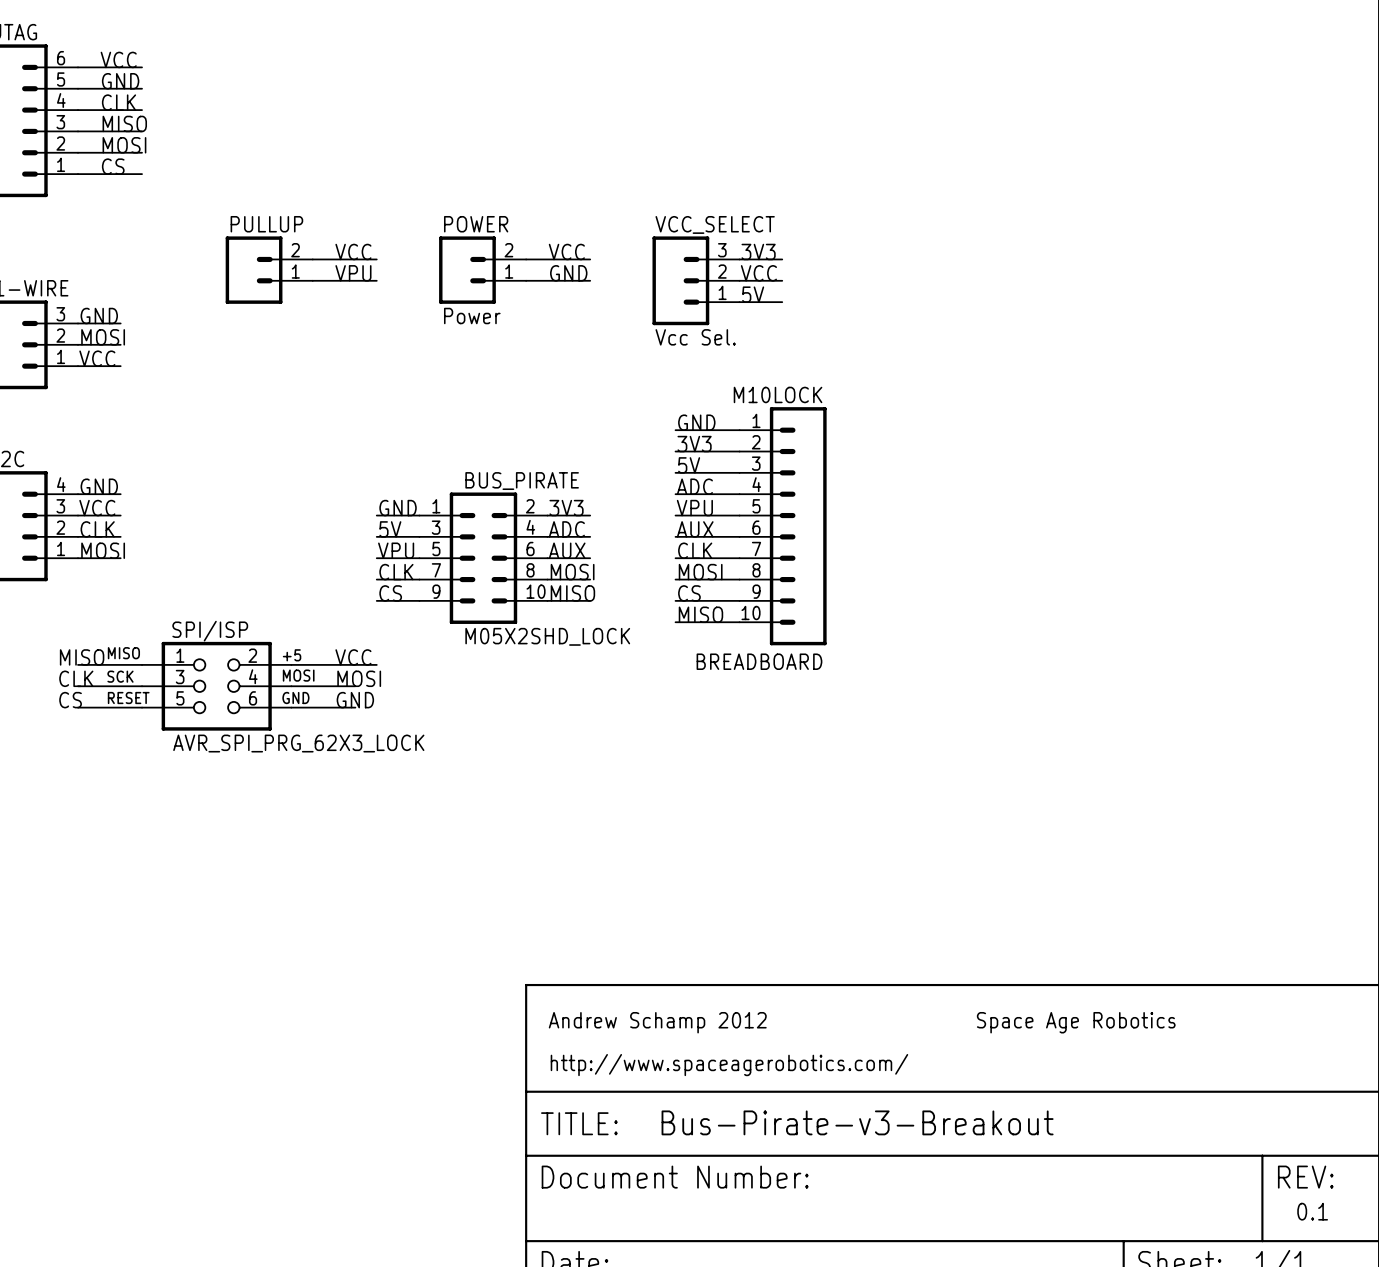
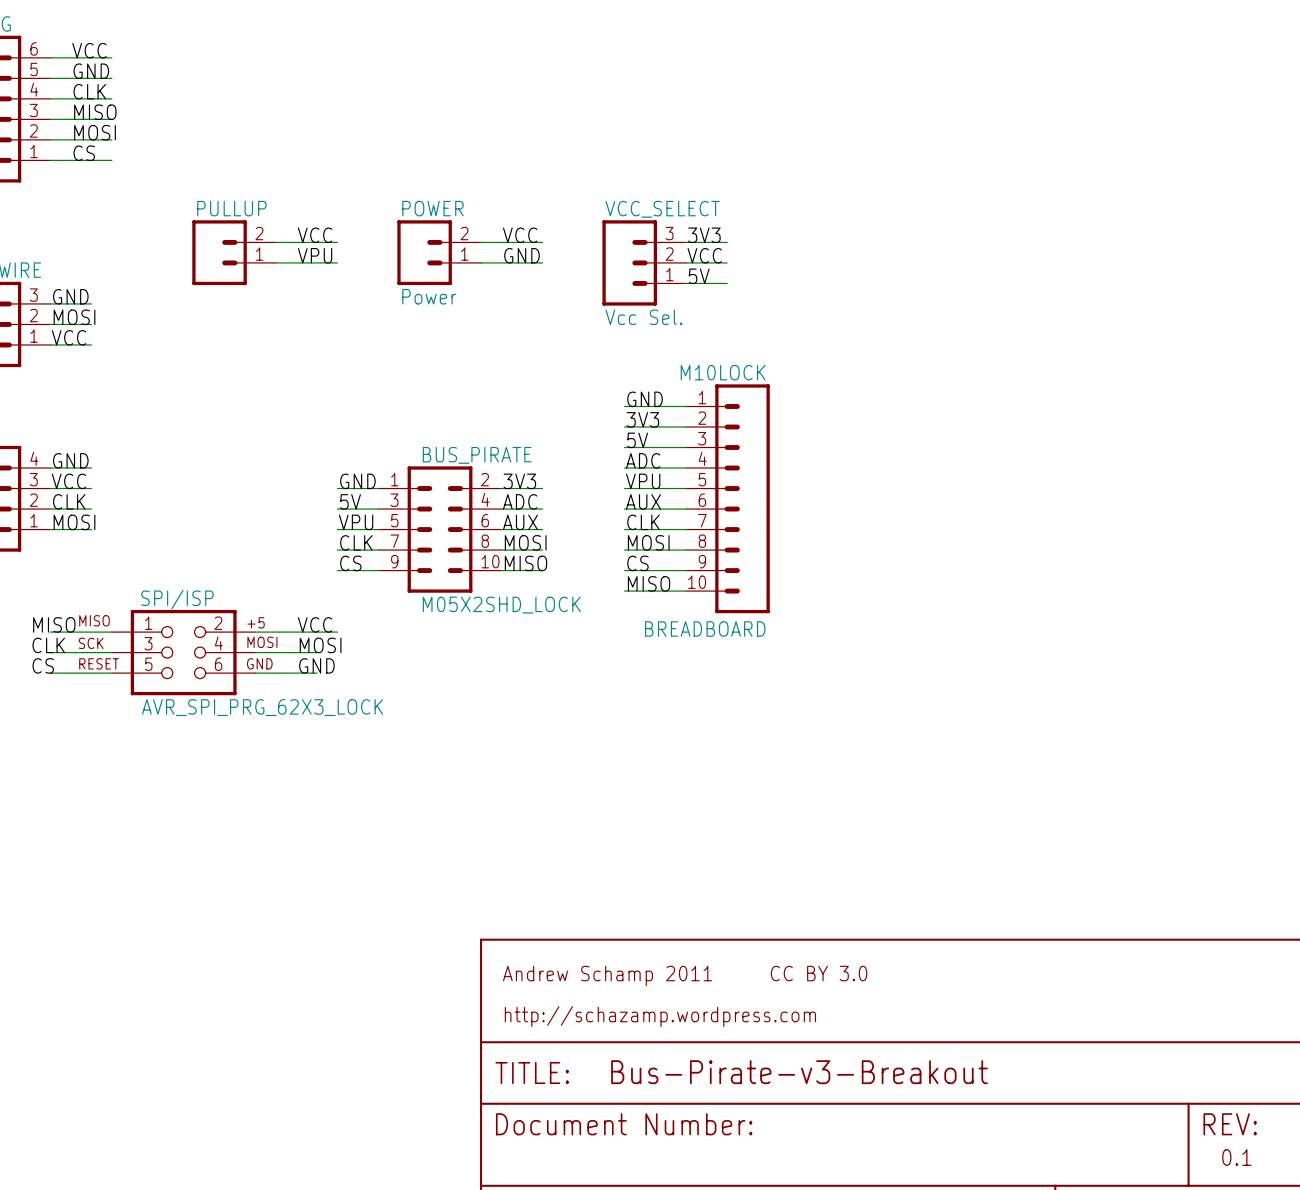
text: none -> CC BY 3.0 (819, 973)
text: Andrew Schamp 2012 (657, 1022) -> Andrew Schamp 2011 (607, 975)
text: Space Age Robotics (1076, 1022) -> none
text: http://www.spaceagerobotics.com/ (729, 1065) -> http://schazamp.wordpress.com (660, 1016)

